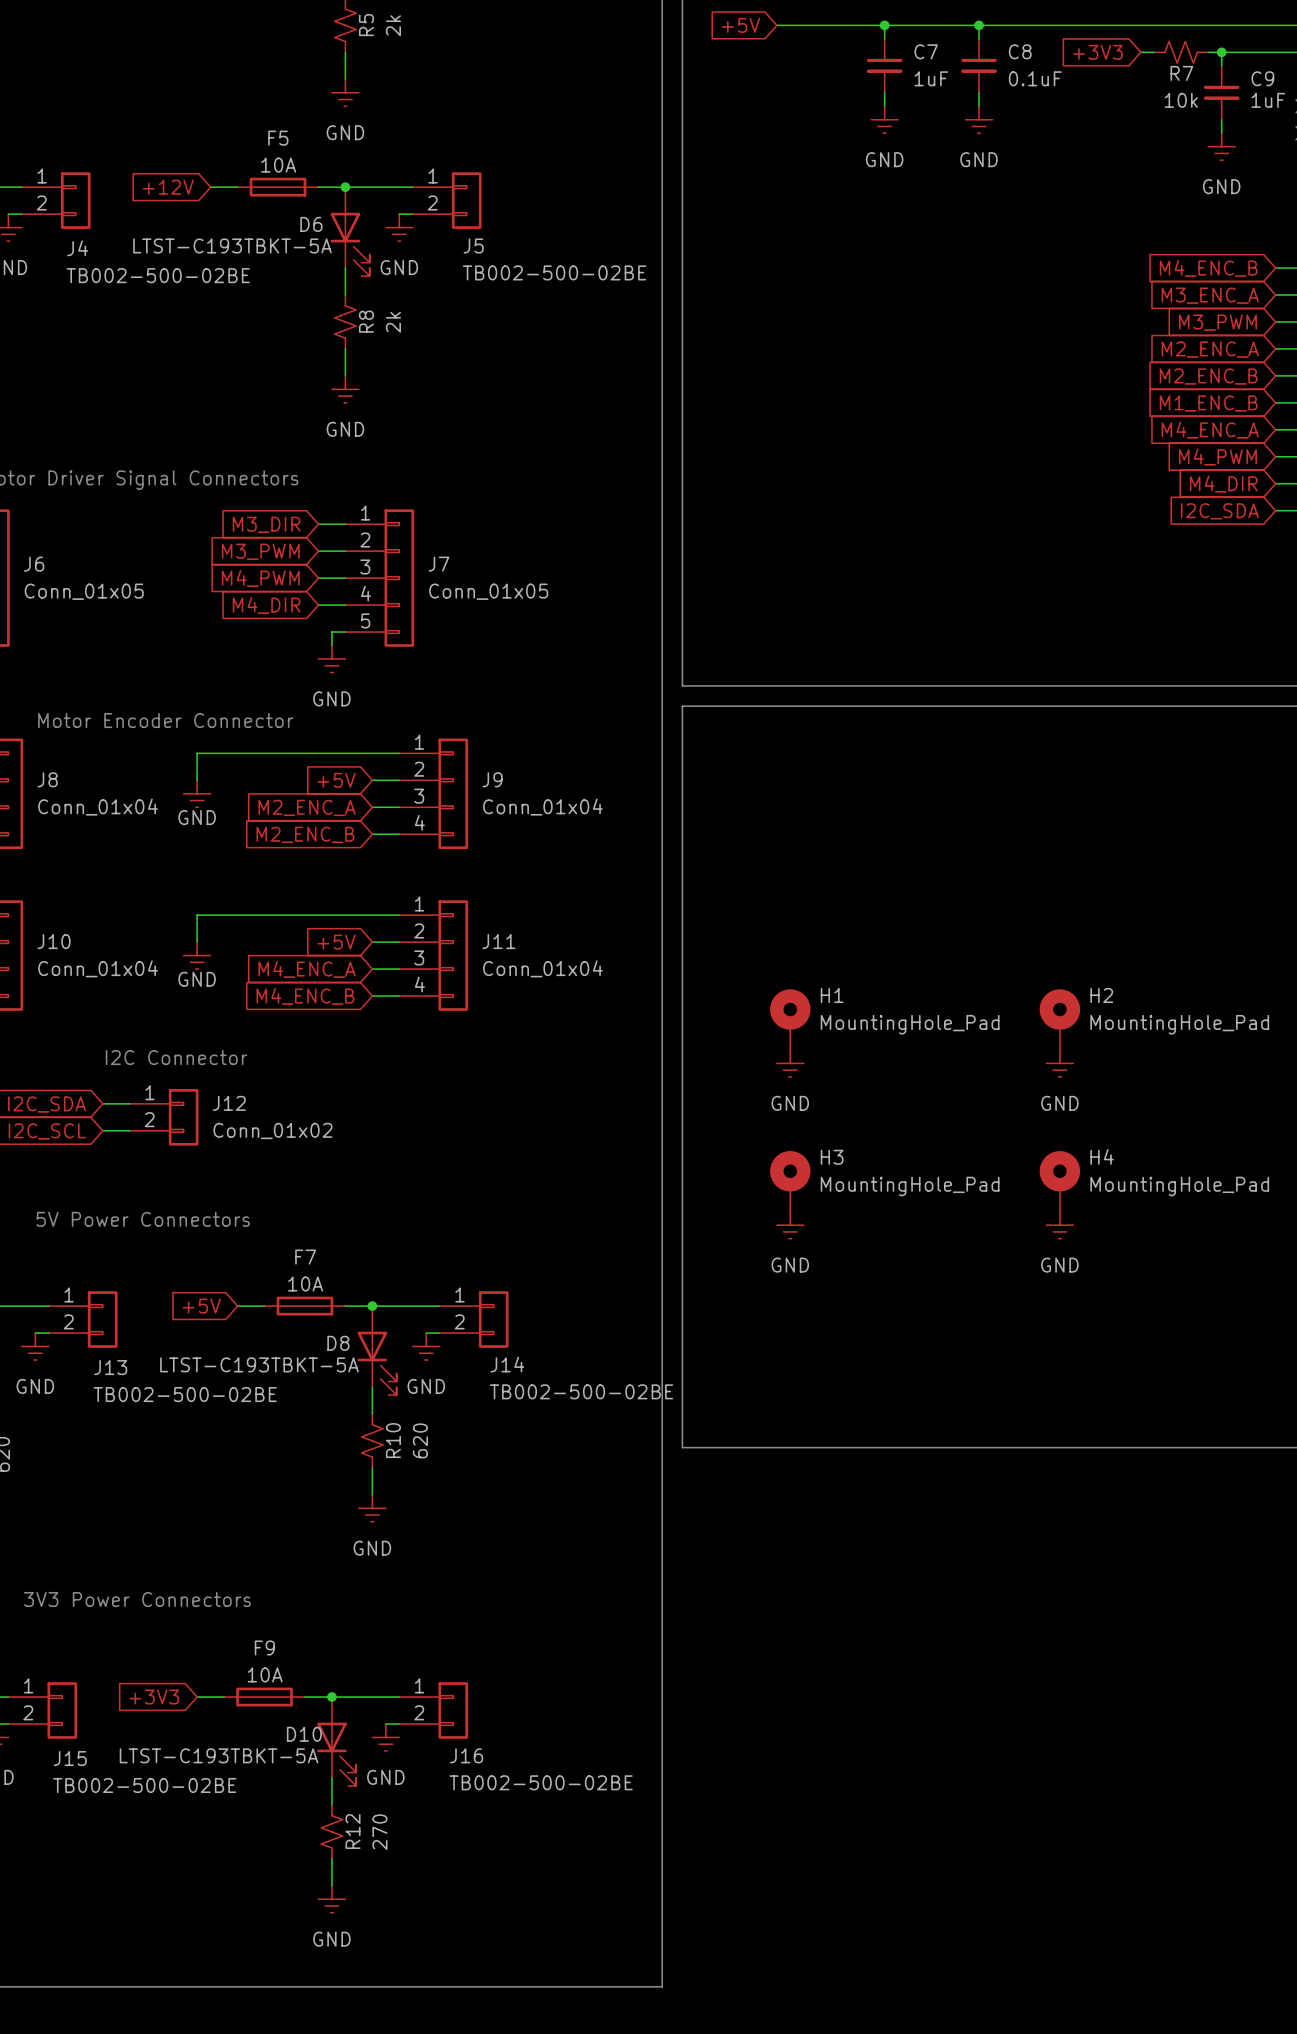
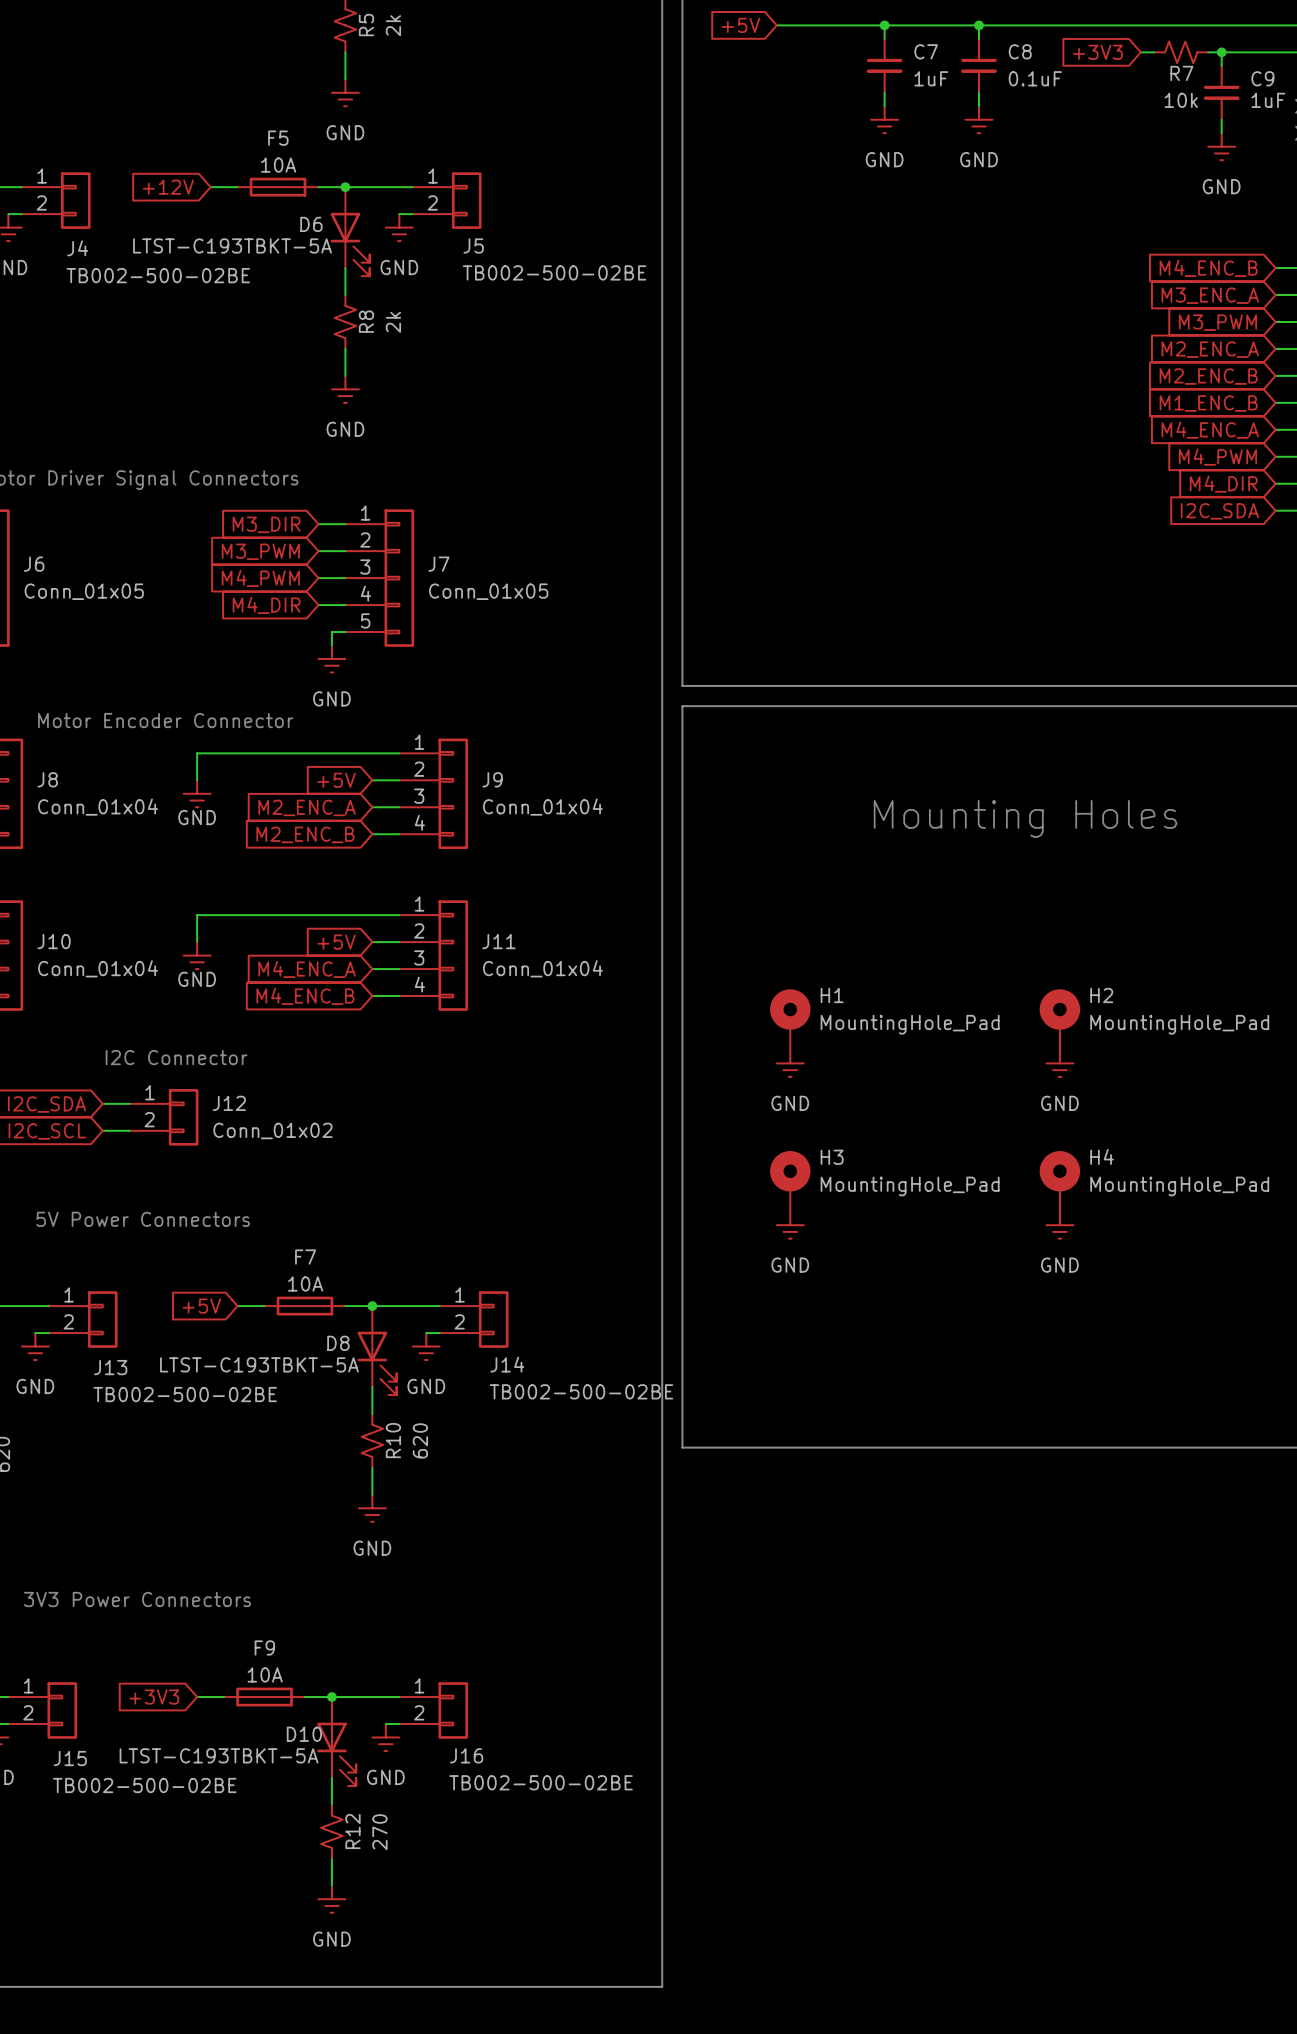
text: none -> Mounting Holes (1025, 818)

